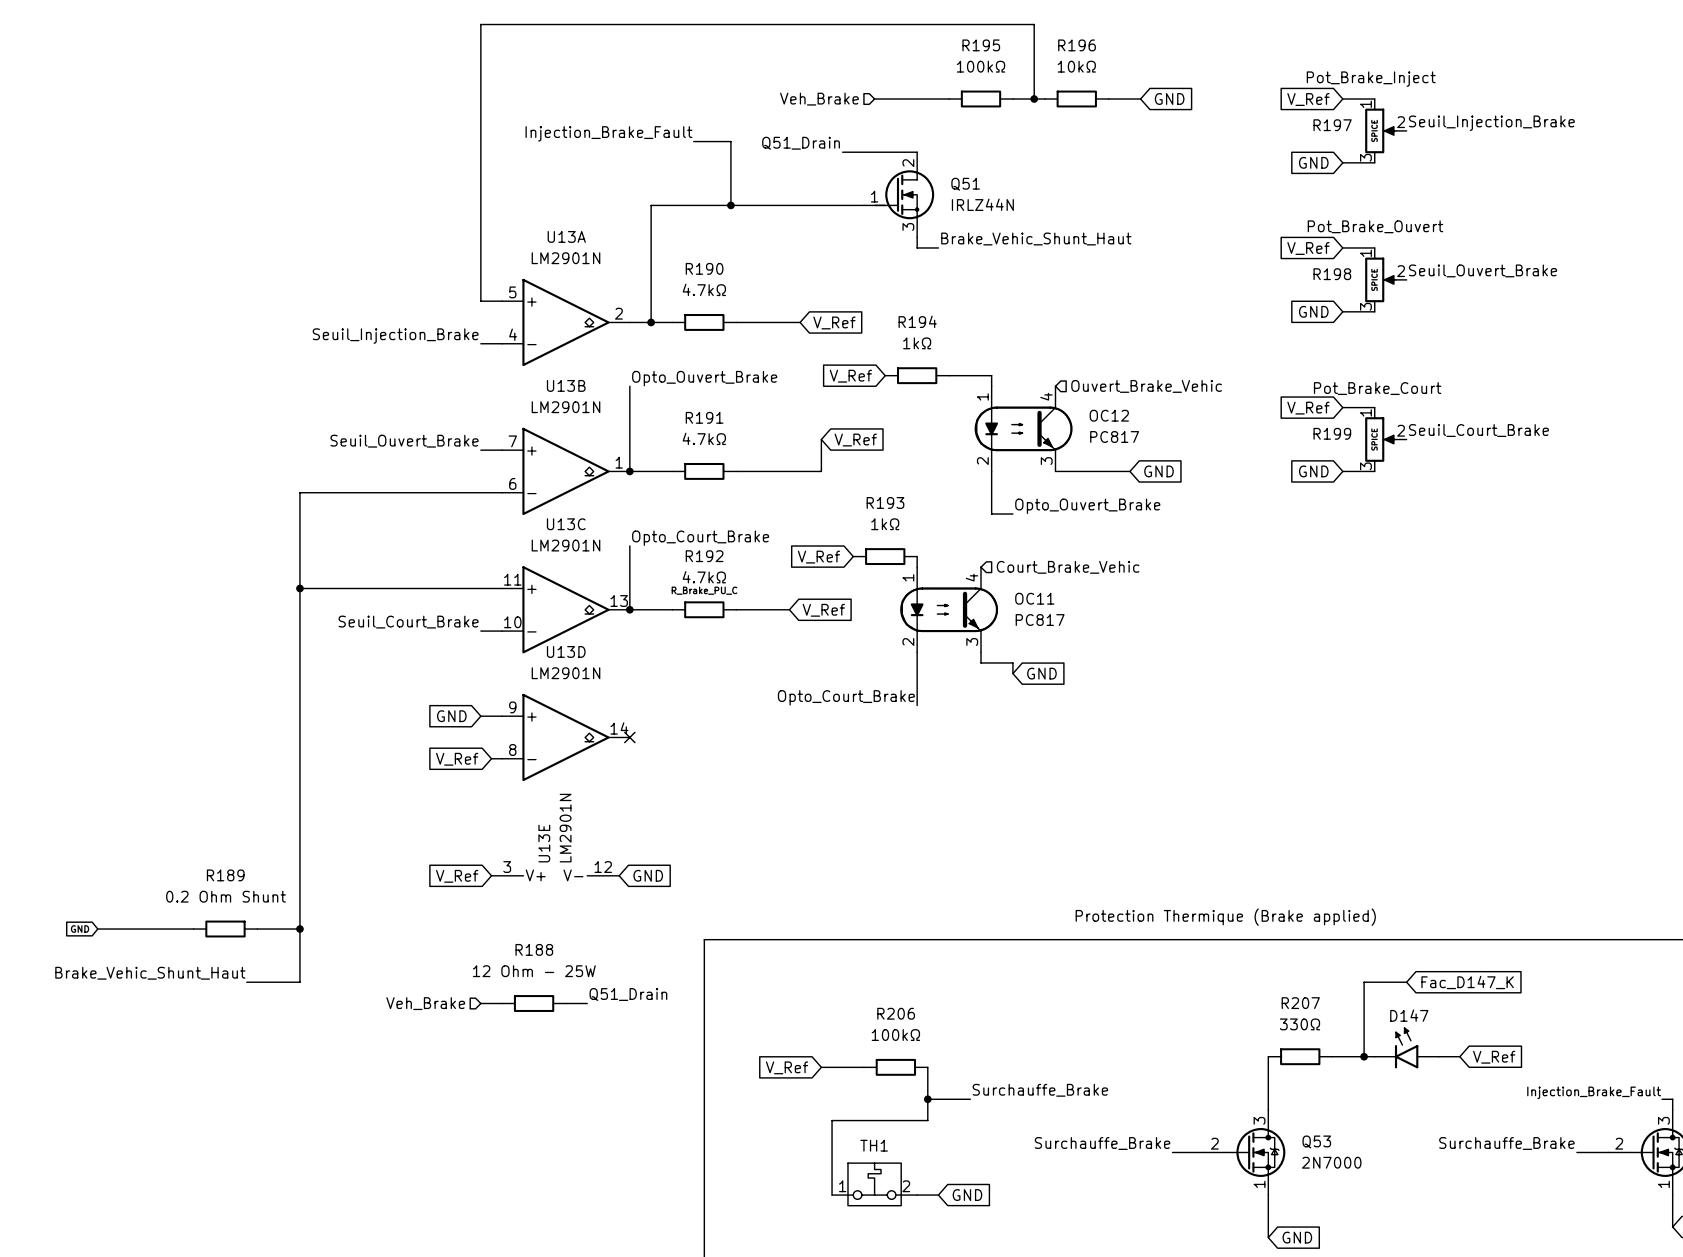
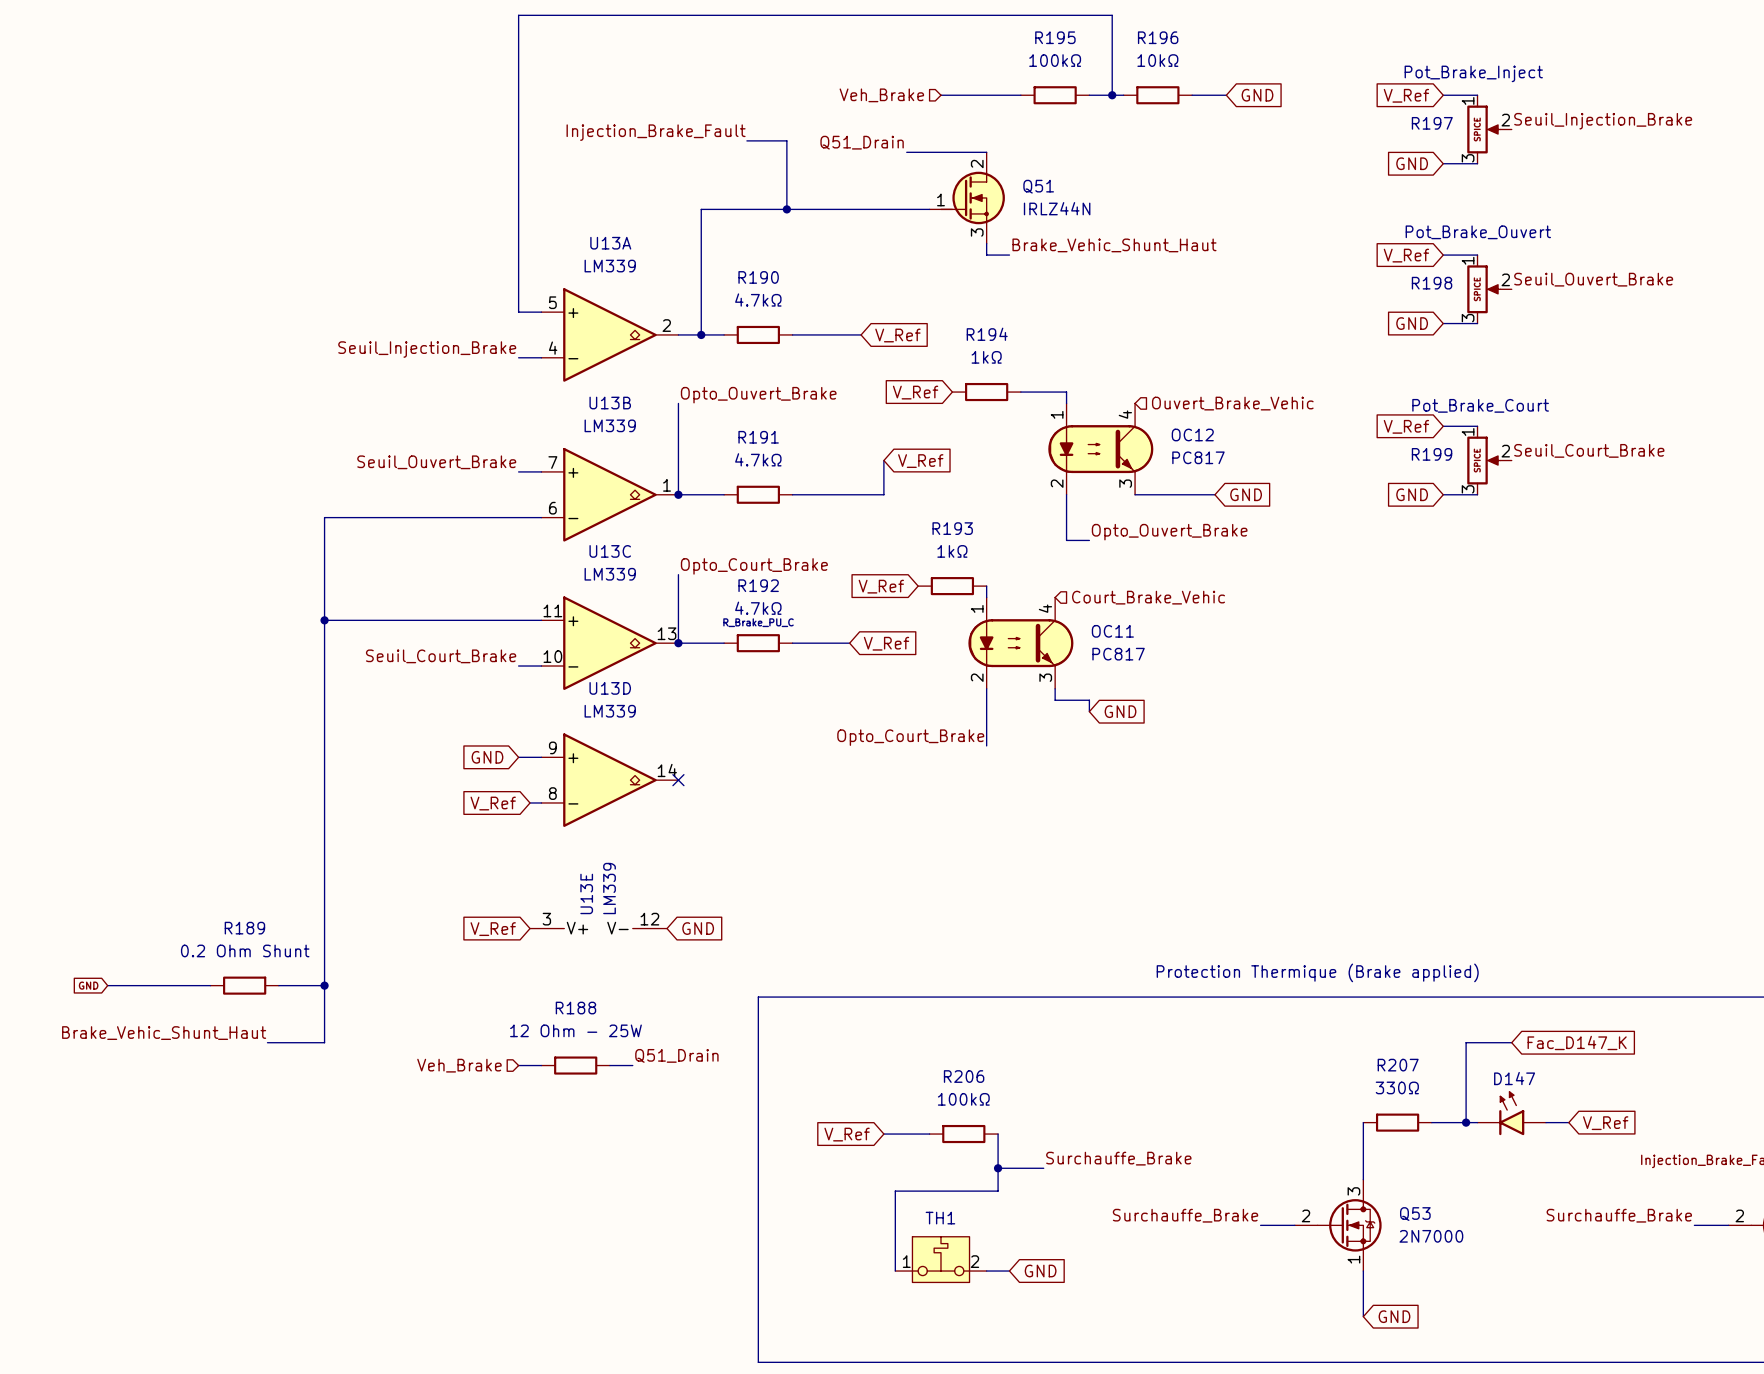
U13A value: LM2901N (565, 258) -> LM339 (610, 266)
U13B value: LM2901N (565, 407) -> LM339 (610, 425)
U13C value: LM2901N (565, 545) -> LM339 (610, 574)
U13D value: LM2901N (565, 673) -> LM339 (610, 711)
U13E value: LM2901N (565, 828) -> LM339 (609, 888)

